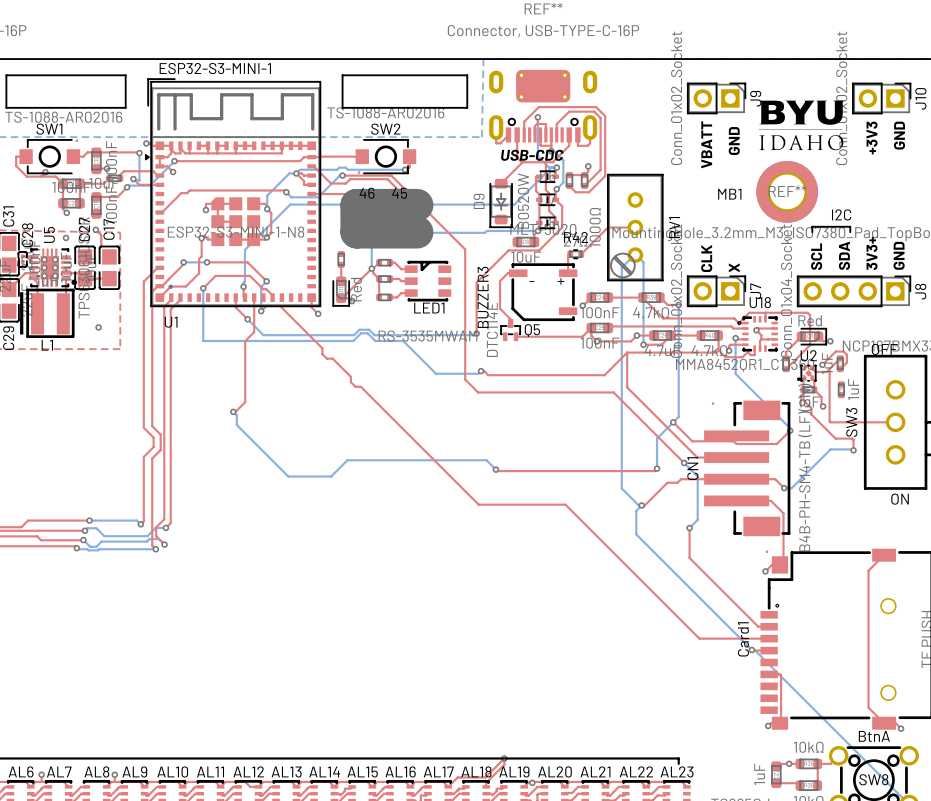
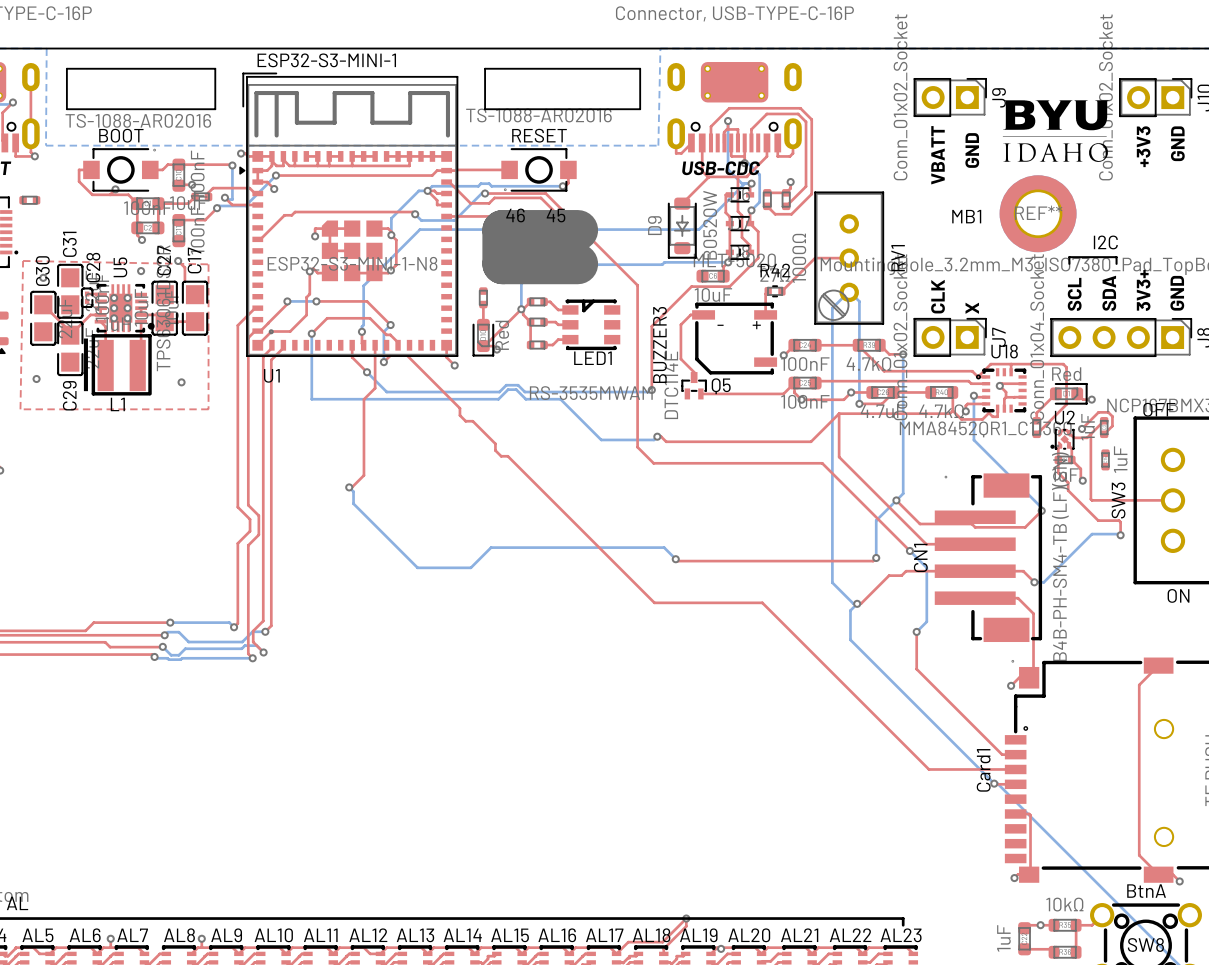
SW1 name: SW1 (49, 129) -> BOOT (121, 135)
SW2 name: SW2 (385, 129) -> RESET (539, 135)

